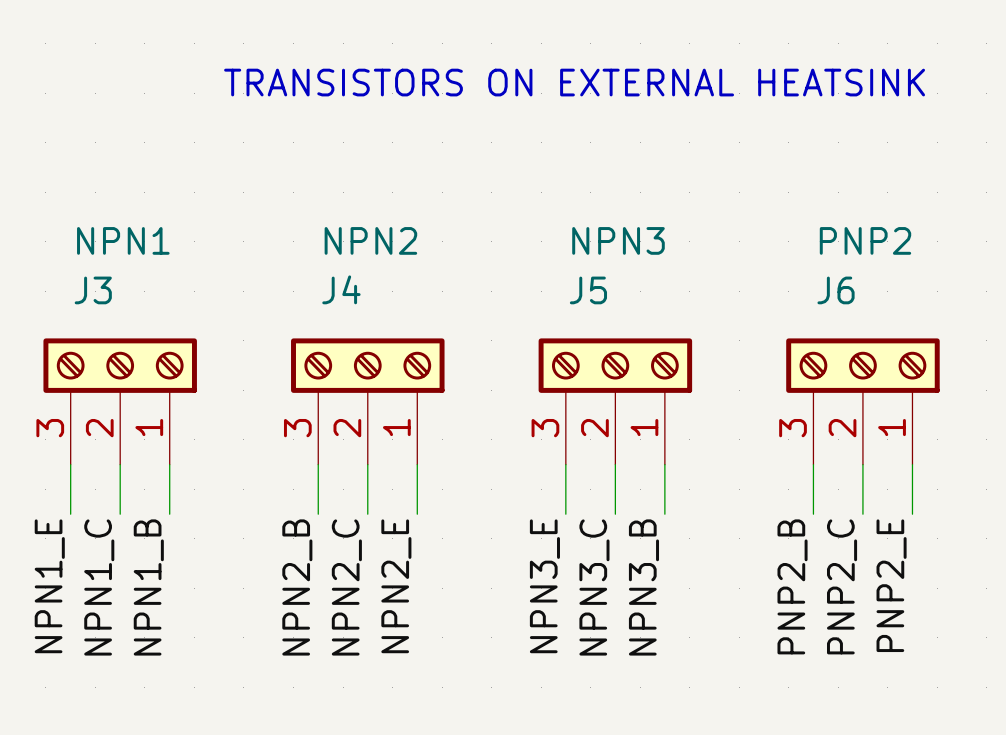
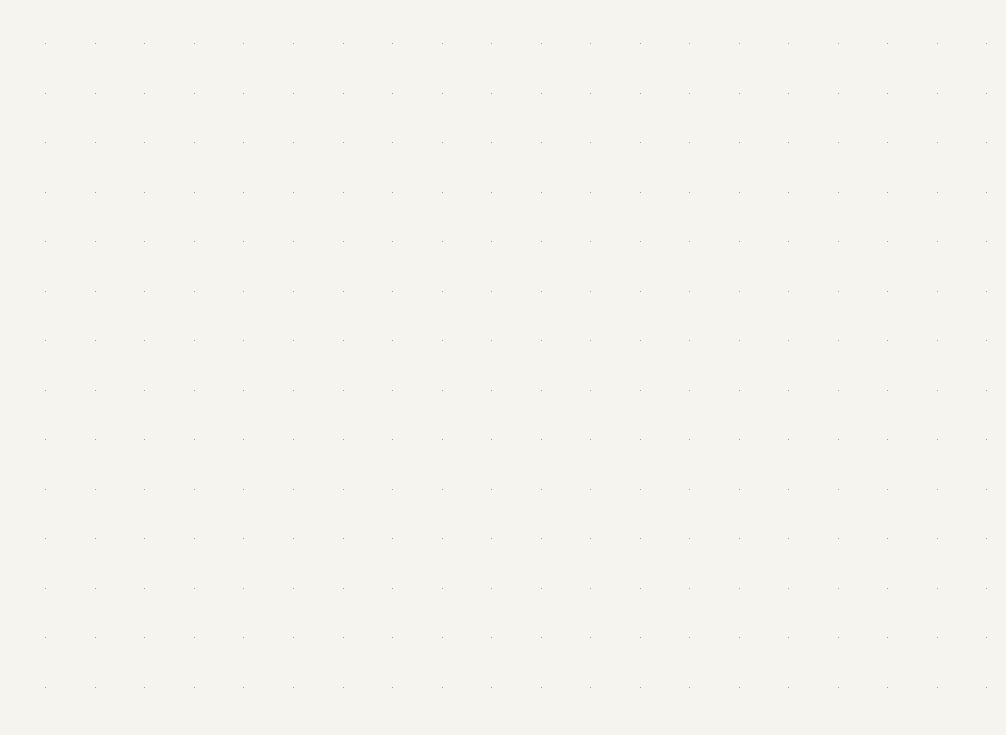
text: TRANSISTORS ON EXTERNAL HEATSINK (574, 82) -> none
J3: NPN1 (120, 401) -> none
J4: NPN2 (367, 401) -> none
J5: NPN3 (615, 401) -> none
J6: PNP2 (862, 401) -> none
wire: (70, 464) (70, 514) -> none
wire: (120, 464) (120, 514) -> none
wire: (169, 464) (169, 514) -> none
wire: (318, 464) (318, 514) -> none
wire: (367, 464) (367, 514) -> none
wire: (417, 464) (417, 514) -> none
wire: (565, 464) (565, 514) -> none
wire: (615, 464) (615, 514) -> none
wire: (664, 464) (664, 514) -> none
wire: (813, 464) (813, 514) -> none
wire: (862, 464) (862, 514) -> none
wire: (912, 464) (912, 514) -> none
label: PNP2_E (891, 585) -> none
label: NPN1_E (49, 586) -> none
label: NPN2_E (396, 586) -> none
label: NPN3_E (544, 586) -> none
label: PNP2_B (792, 586) -> none
label: PNP2_C (842, 586) -> none
label: NPN1_C (99, 587) -> none
label: NPN1_B (148, 587) -> none
label: NPN2_B (297, 587) -> none
label: NPN2_C (346, 587) -> none
label: NPN3_C (594, 587) -> none
label: NPN3_B (643, 587) -> none

